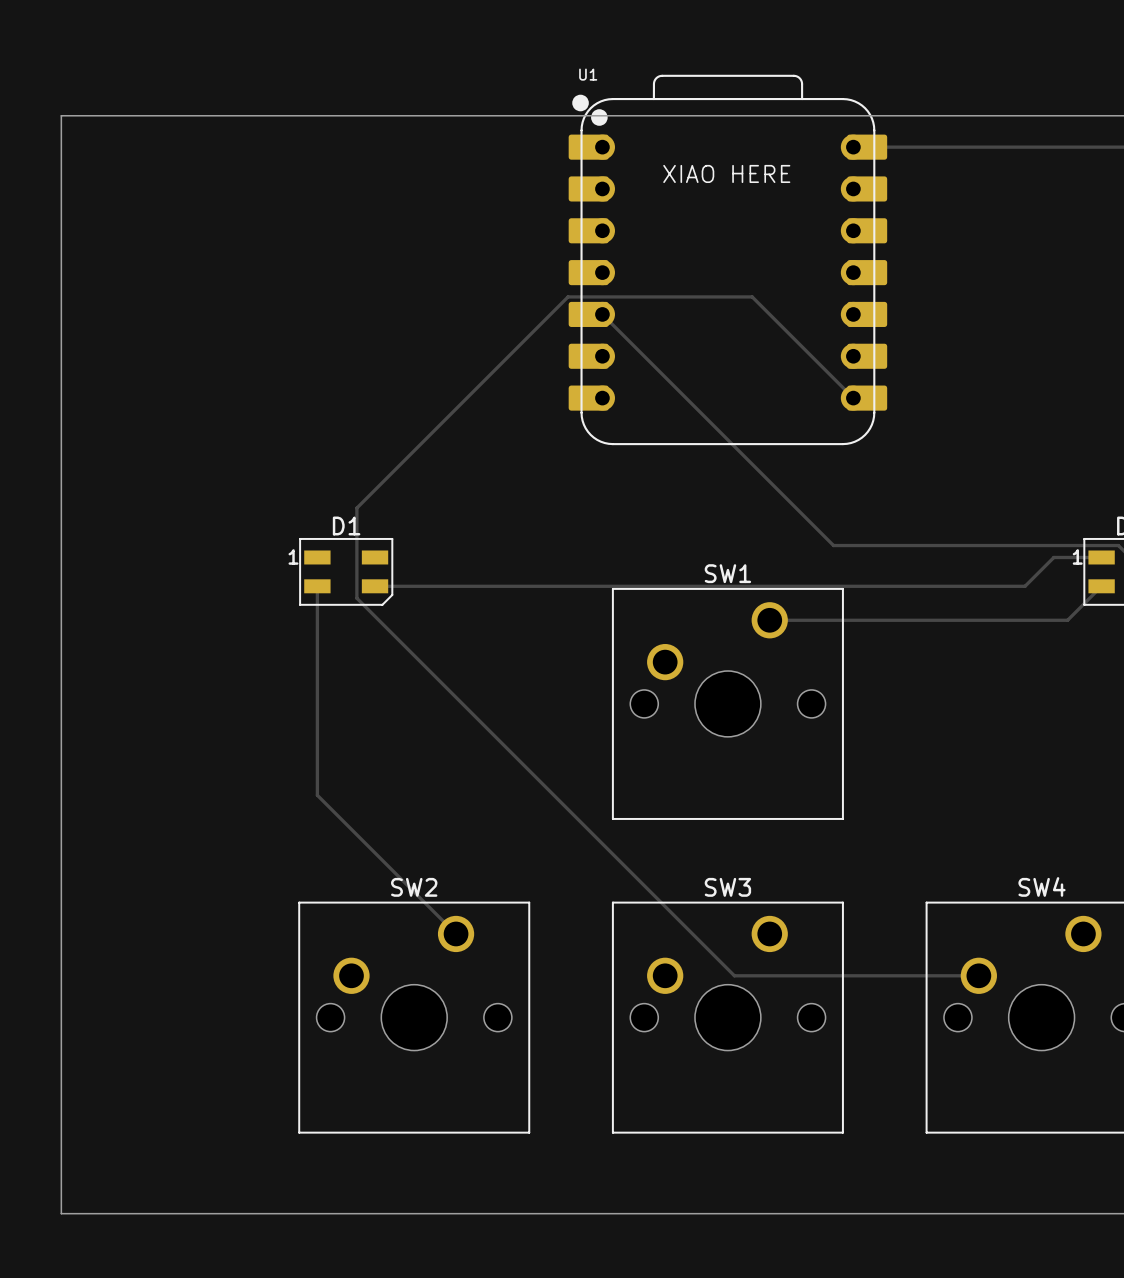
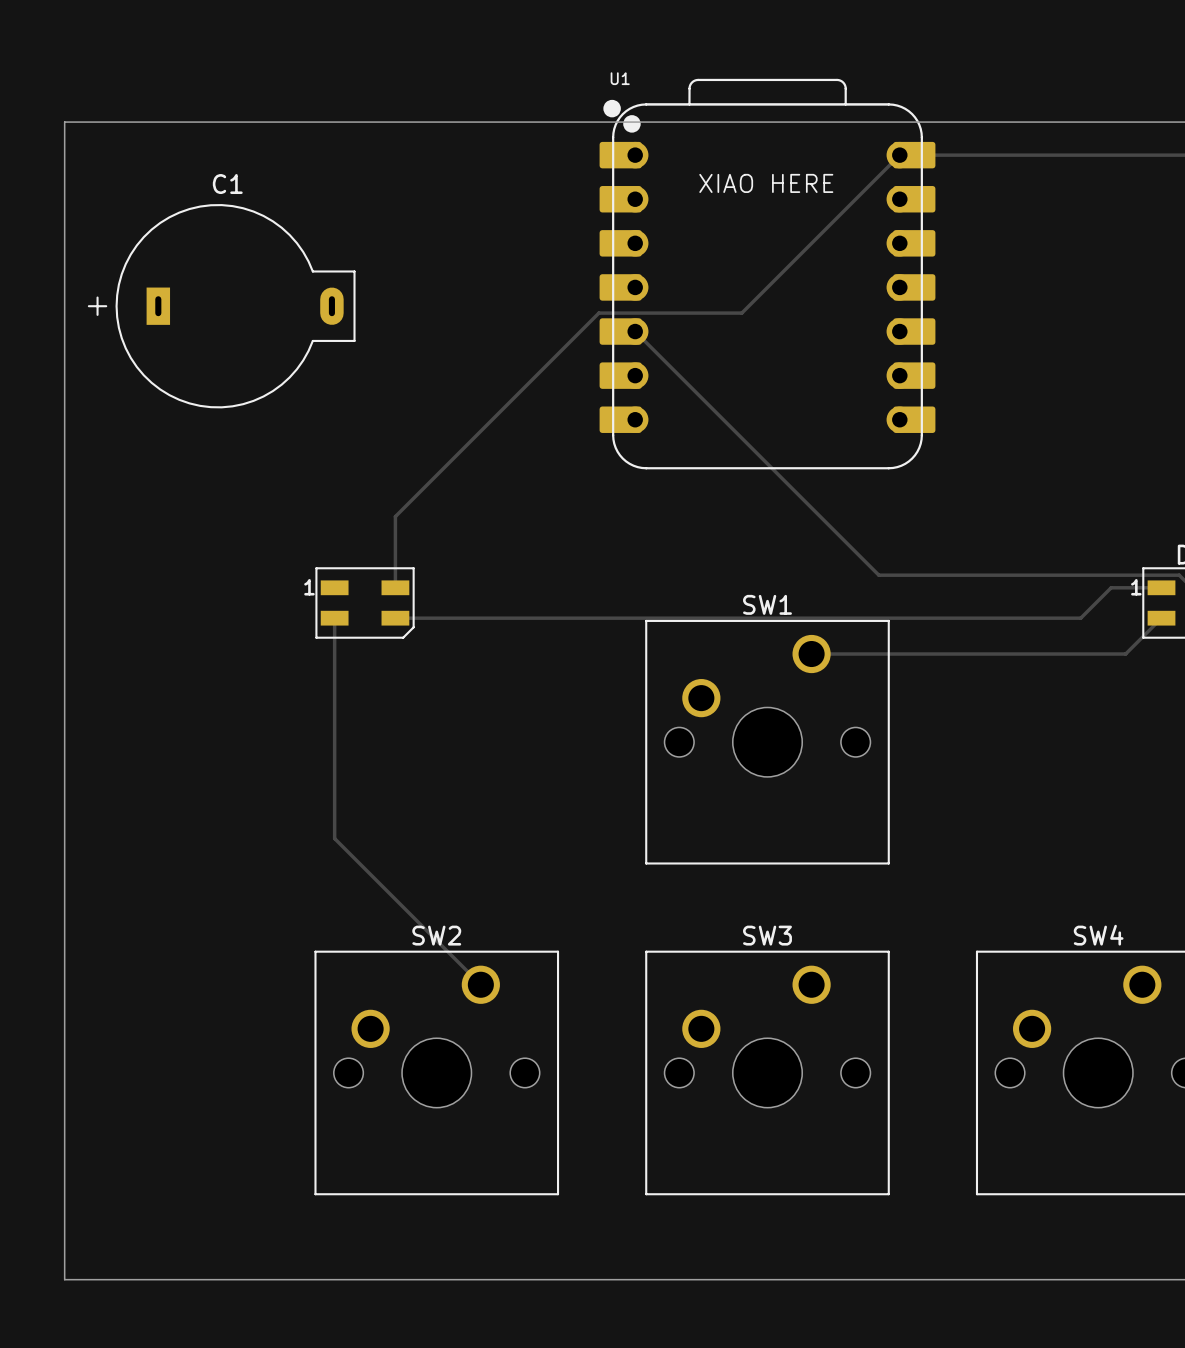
C1: none -> (221, 306)
track: (703, 296) (752, 296) (853, 398) -> (741, 313) (899, 155)
track: (375, 489) (356, 508) (356, 598) (734, 975) (978, 975) -> (395, 516) (395, 587)
D1 name: D1 (346, 525) -> none

